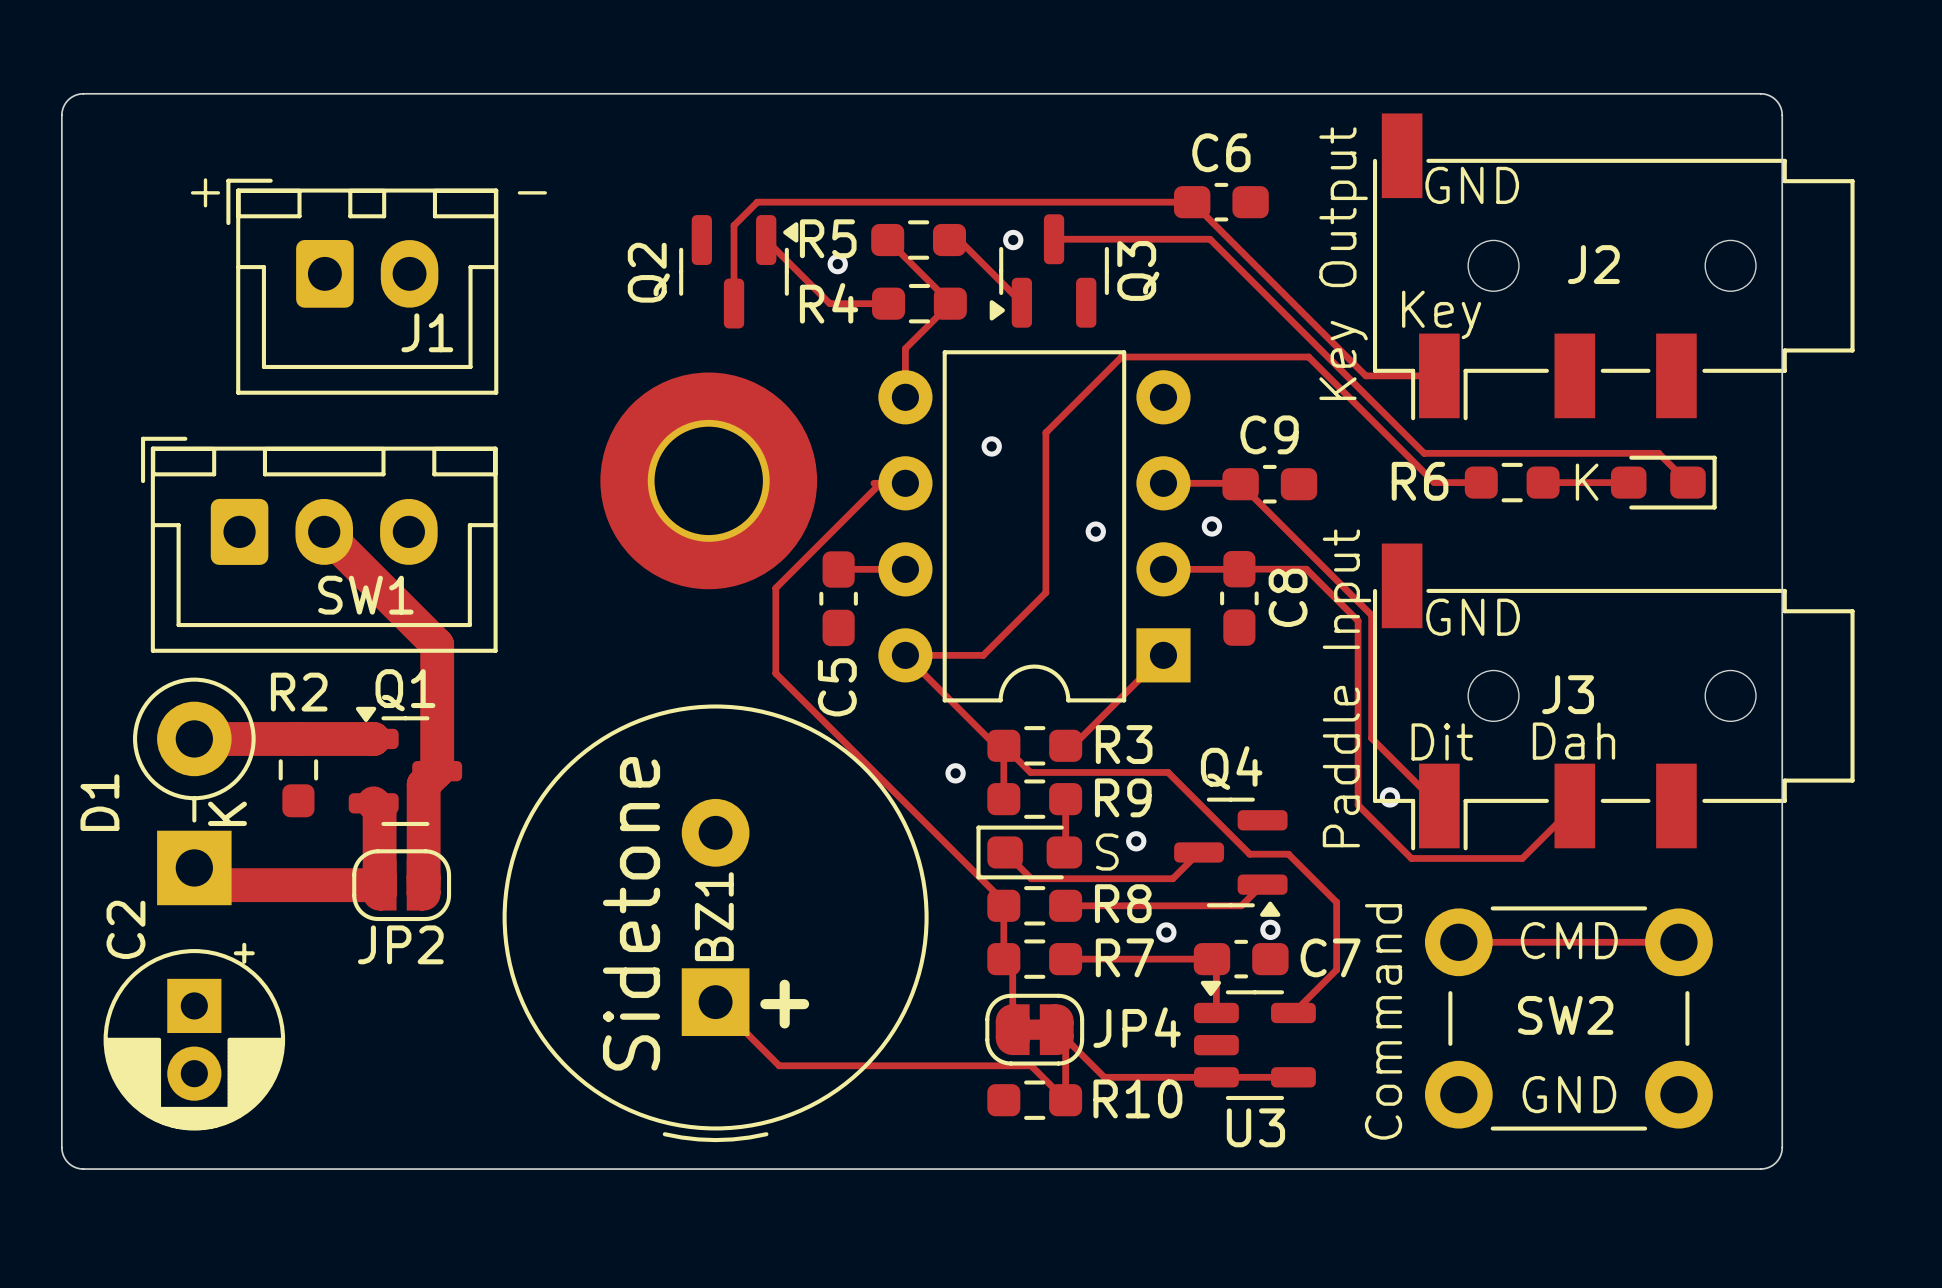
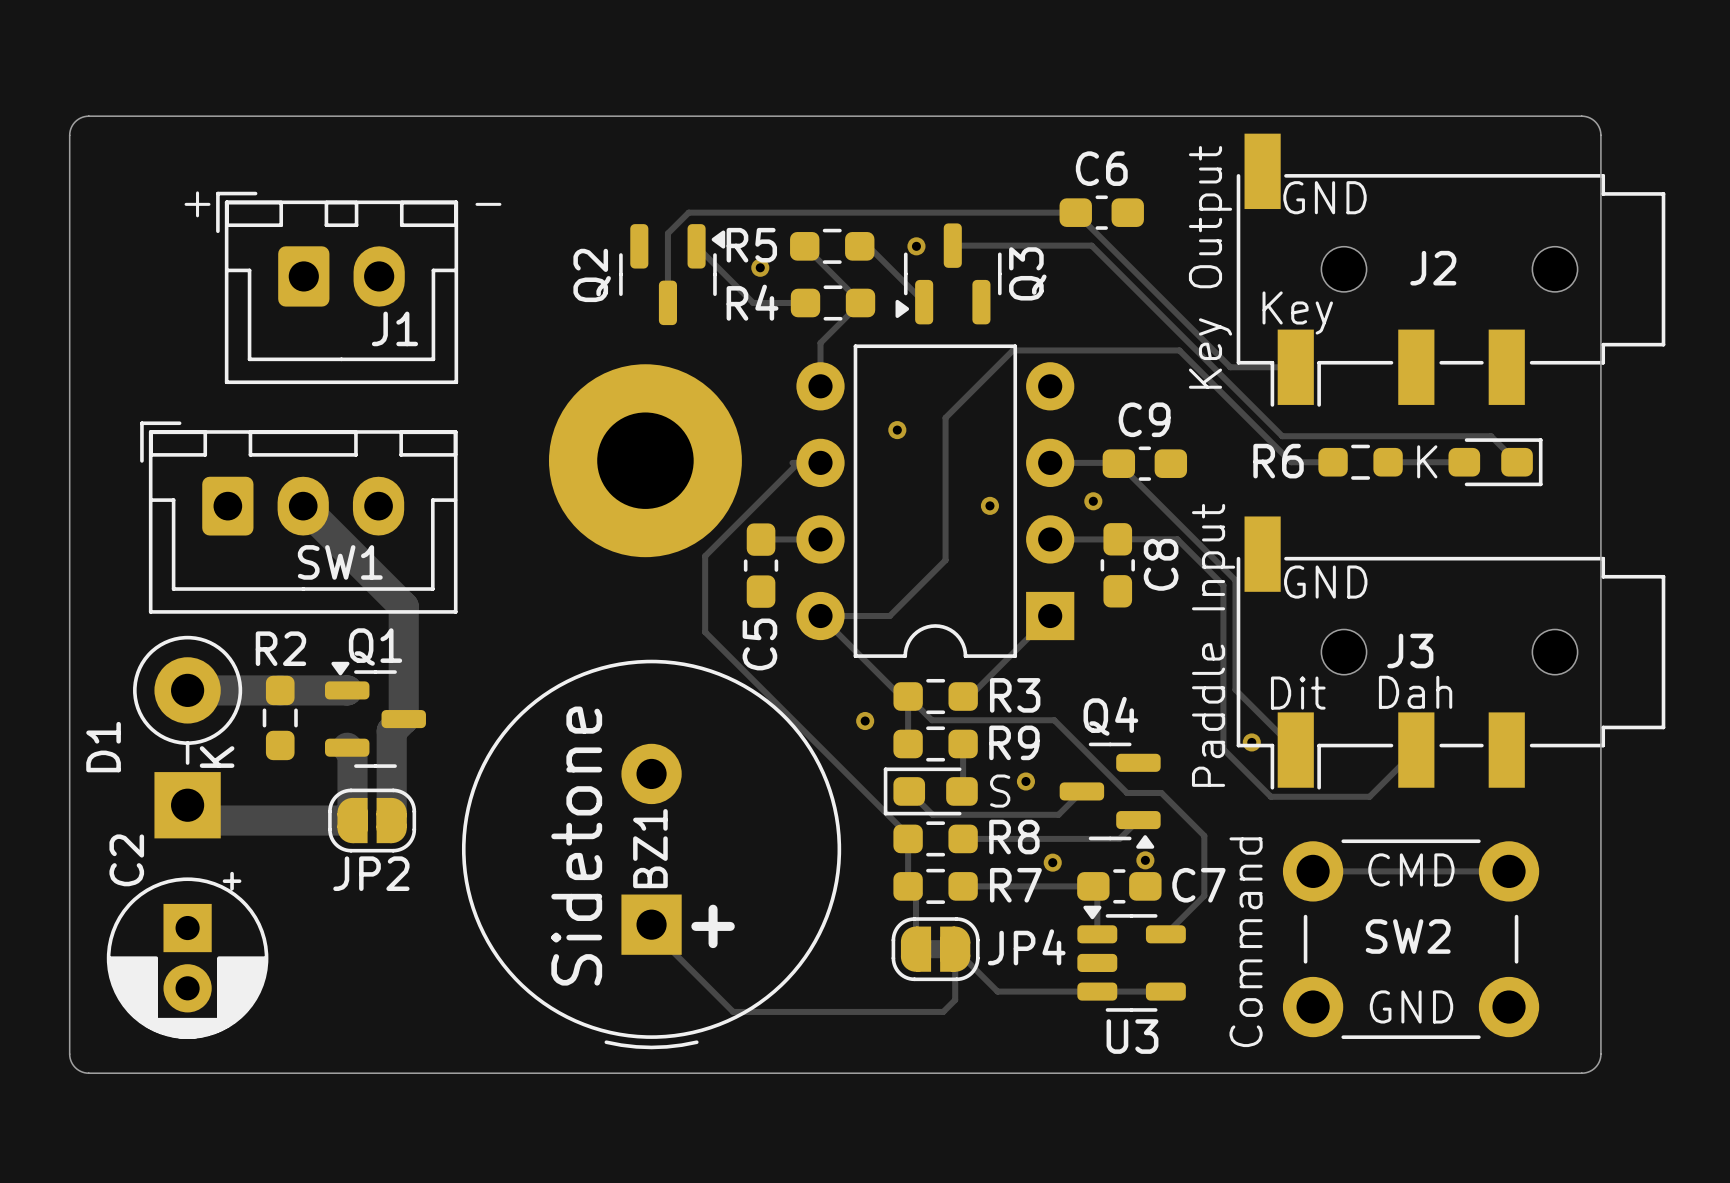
track: (715, 1002) (779, 1065) (1031, 1065) (1065, 1100) (1065, 1038) -> none
track: none -> (649, 927) (733, 1011) (943, 1011) (955, 1000) (955, 949)
R10: (1034, 1100) -> none

